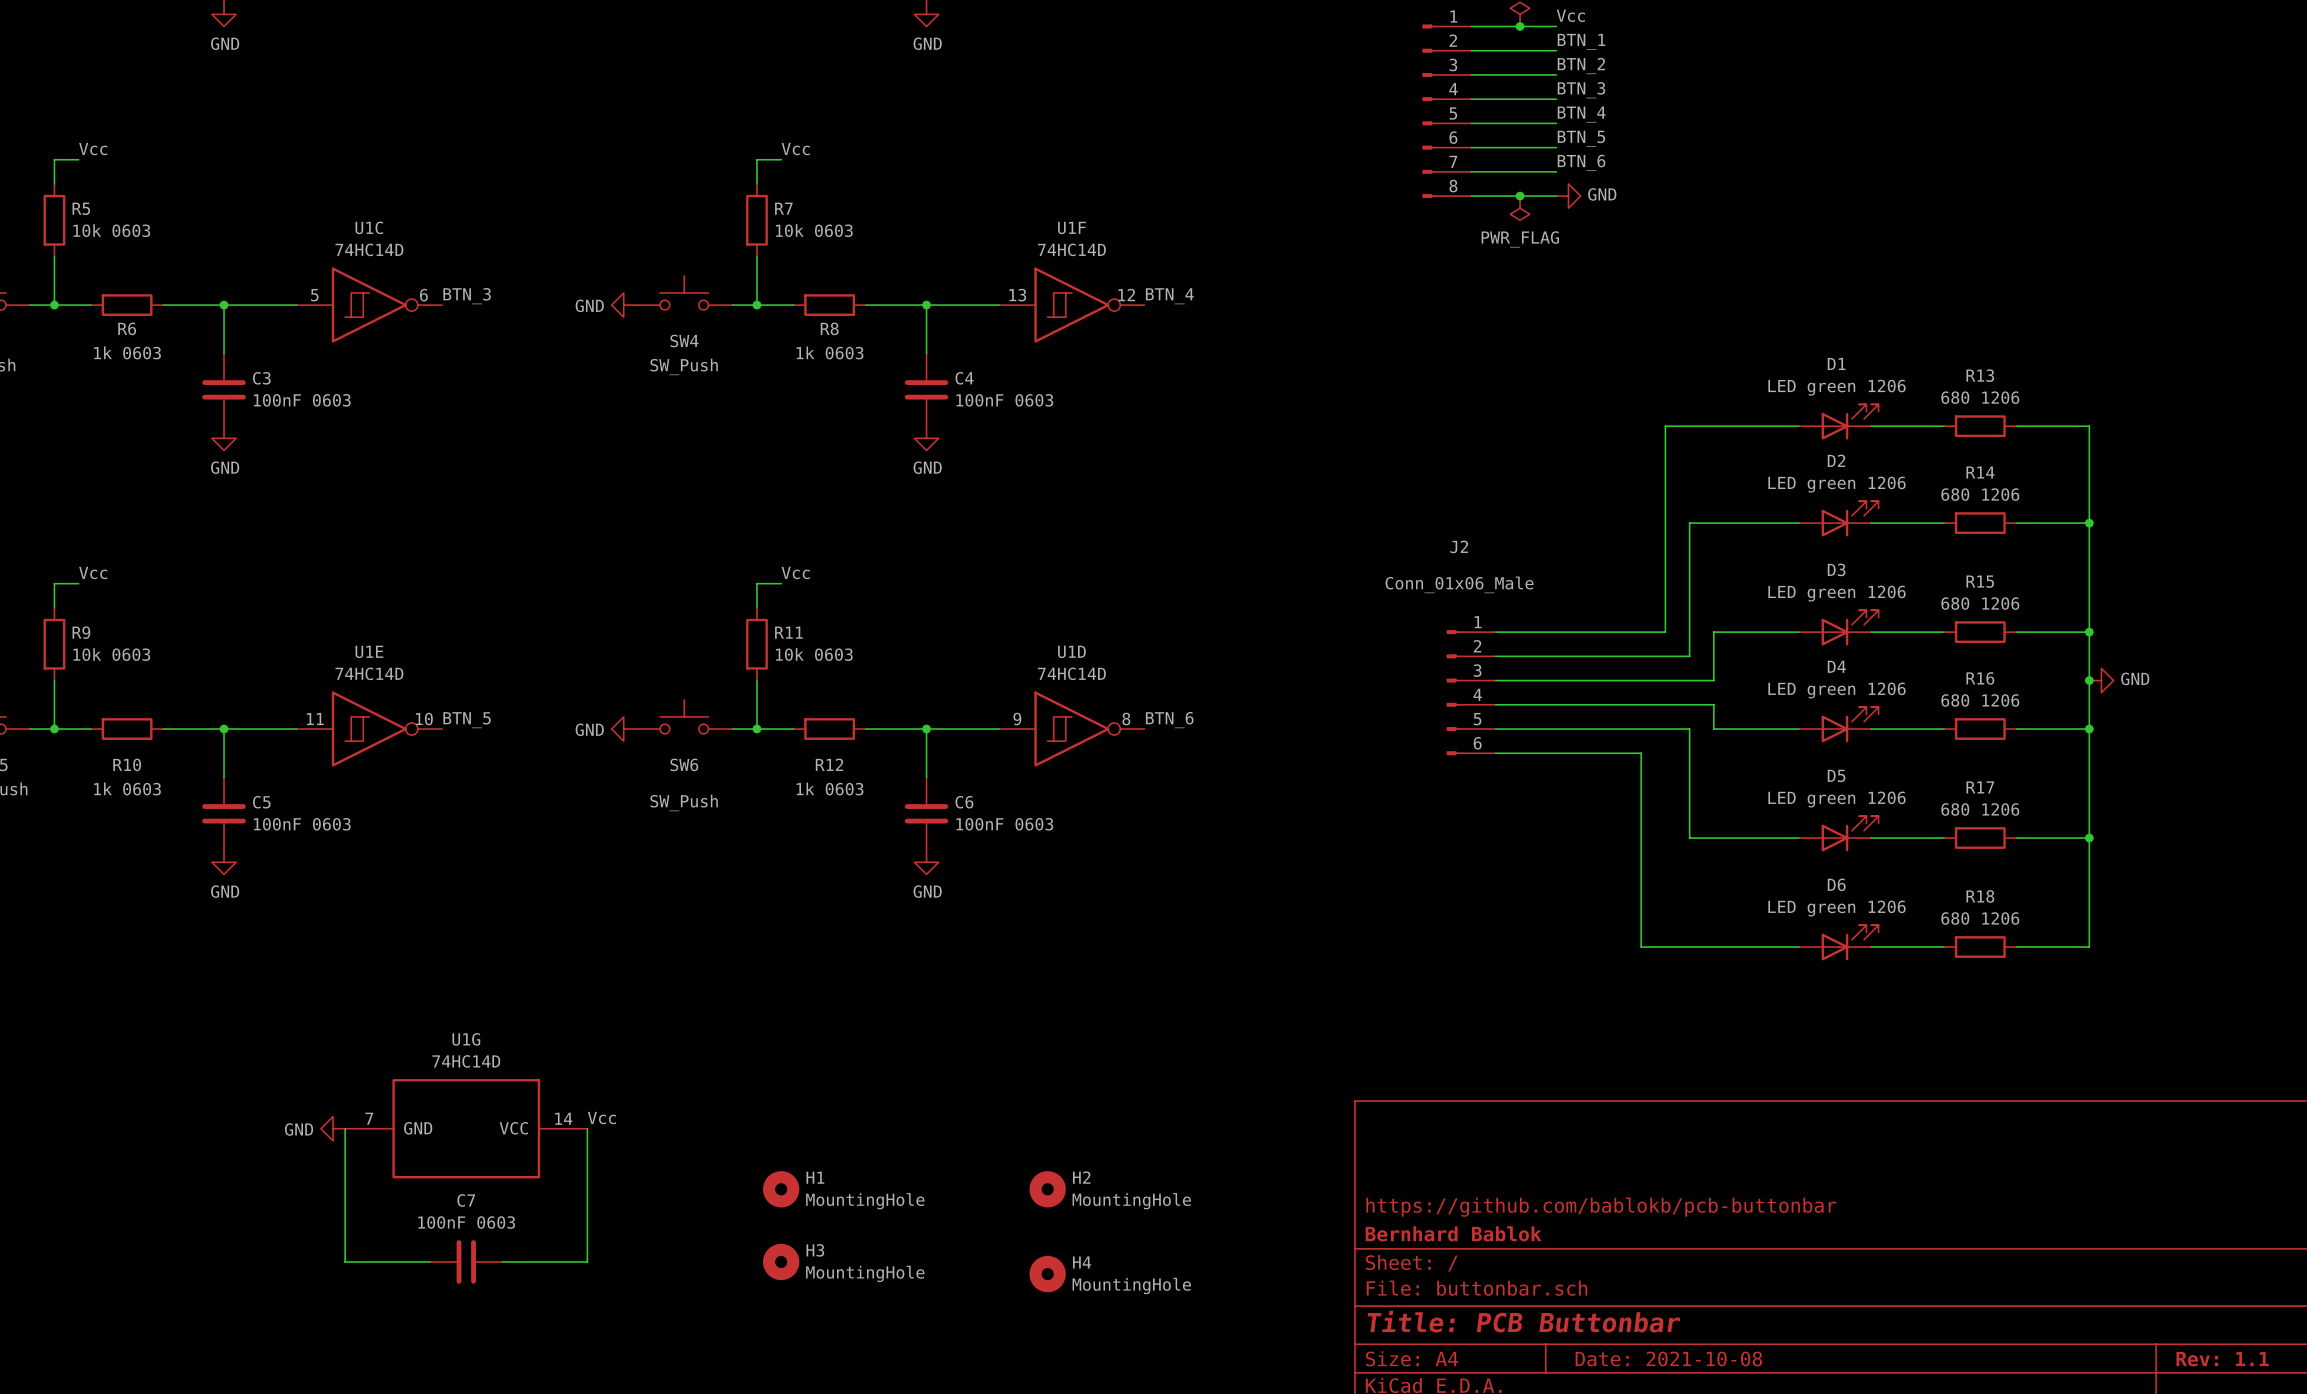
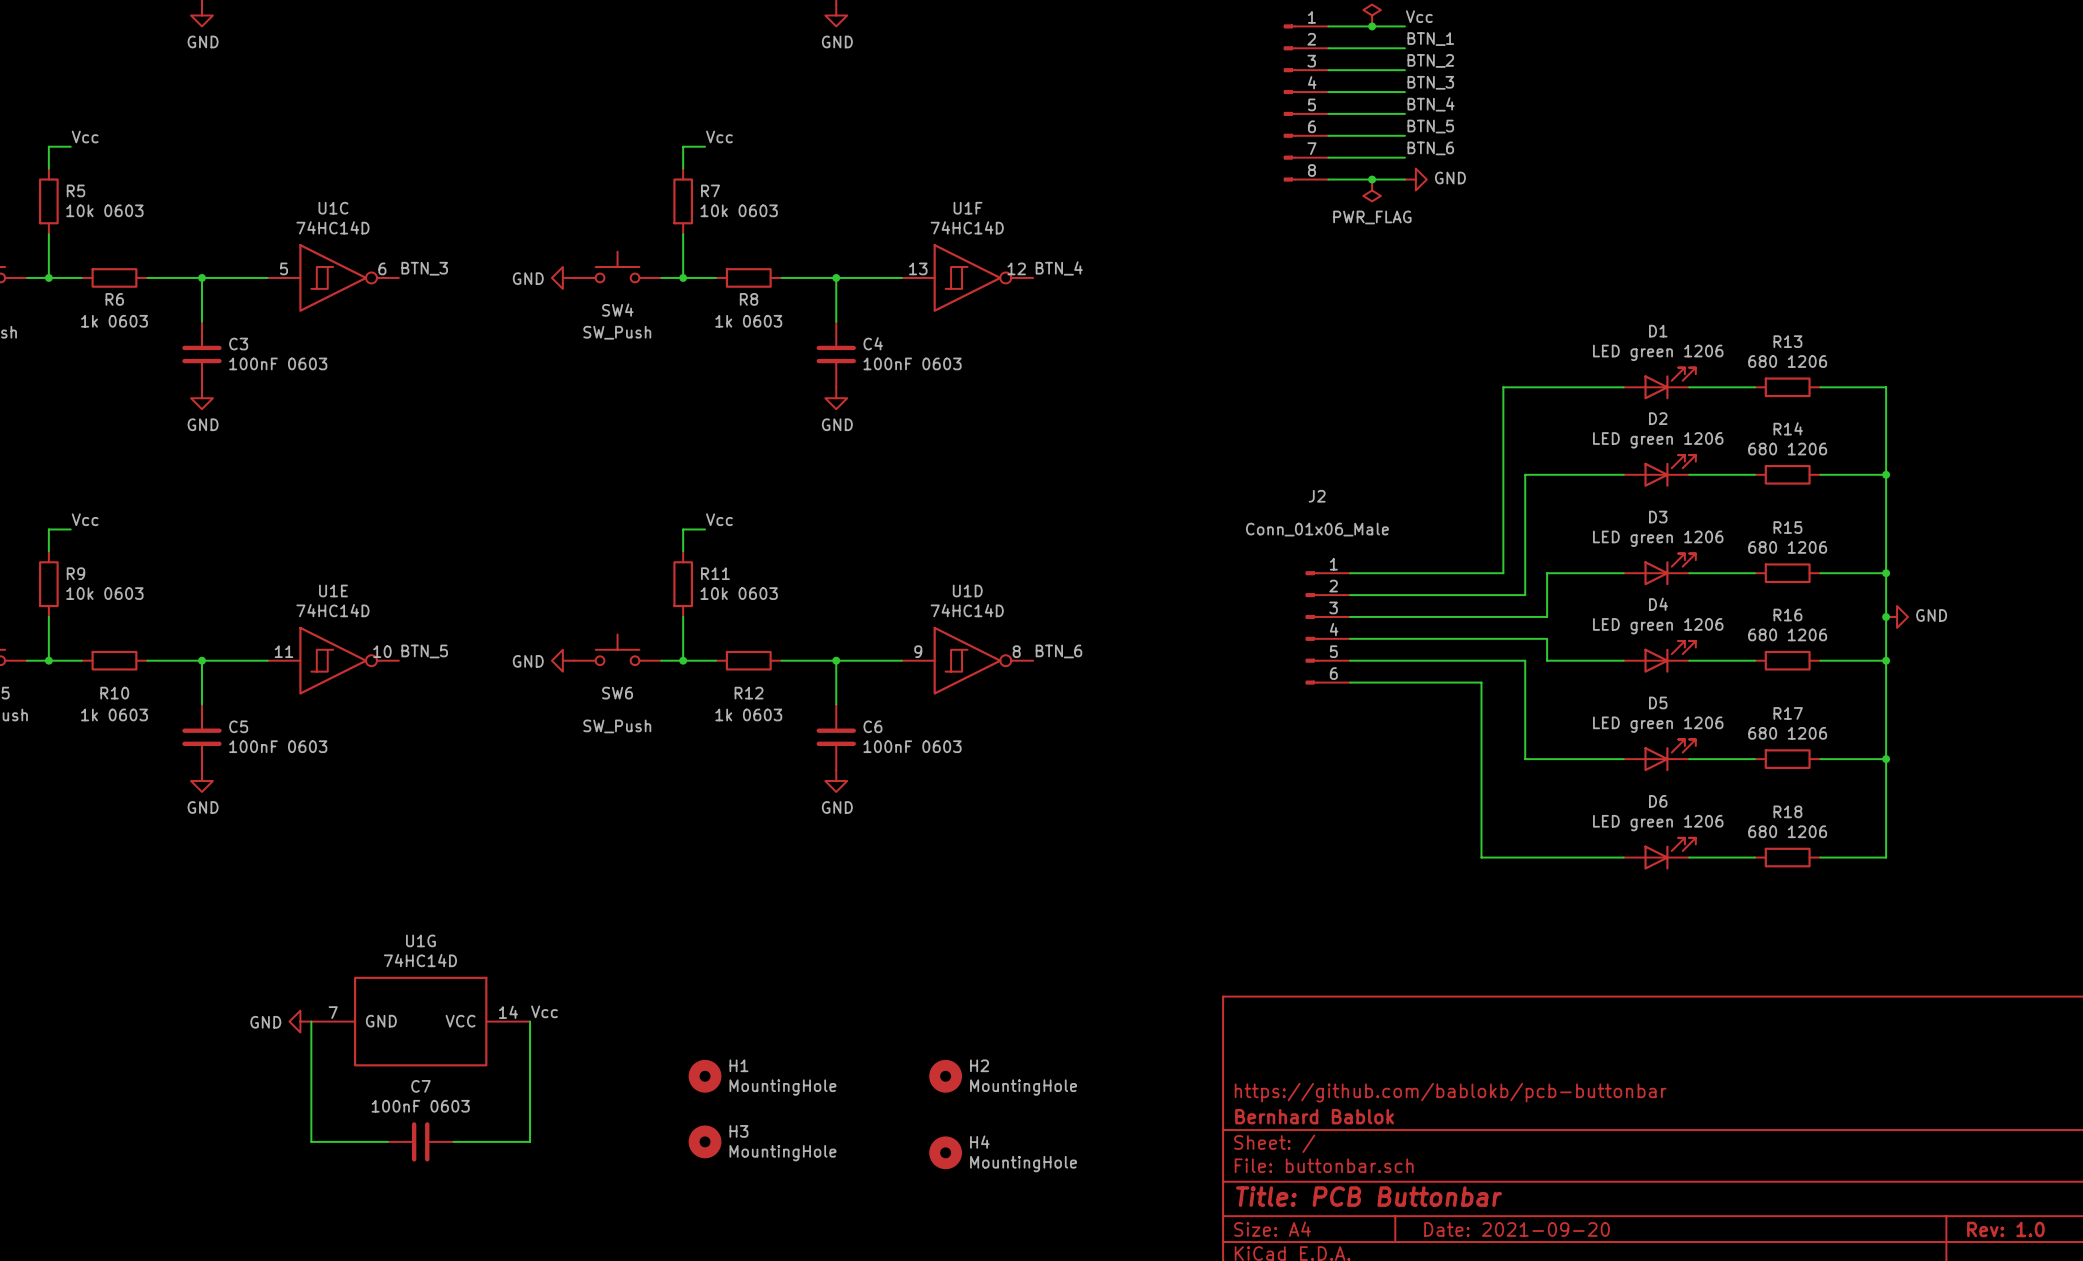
title block: Date: 2021-10-08 (1668, 1358) -> Date: 2021-09-20 (1517, 1229)
title block: Rev: 1.1 (2222, 1359) -> Rev: 1.0 (2005, 1229)

